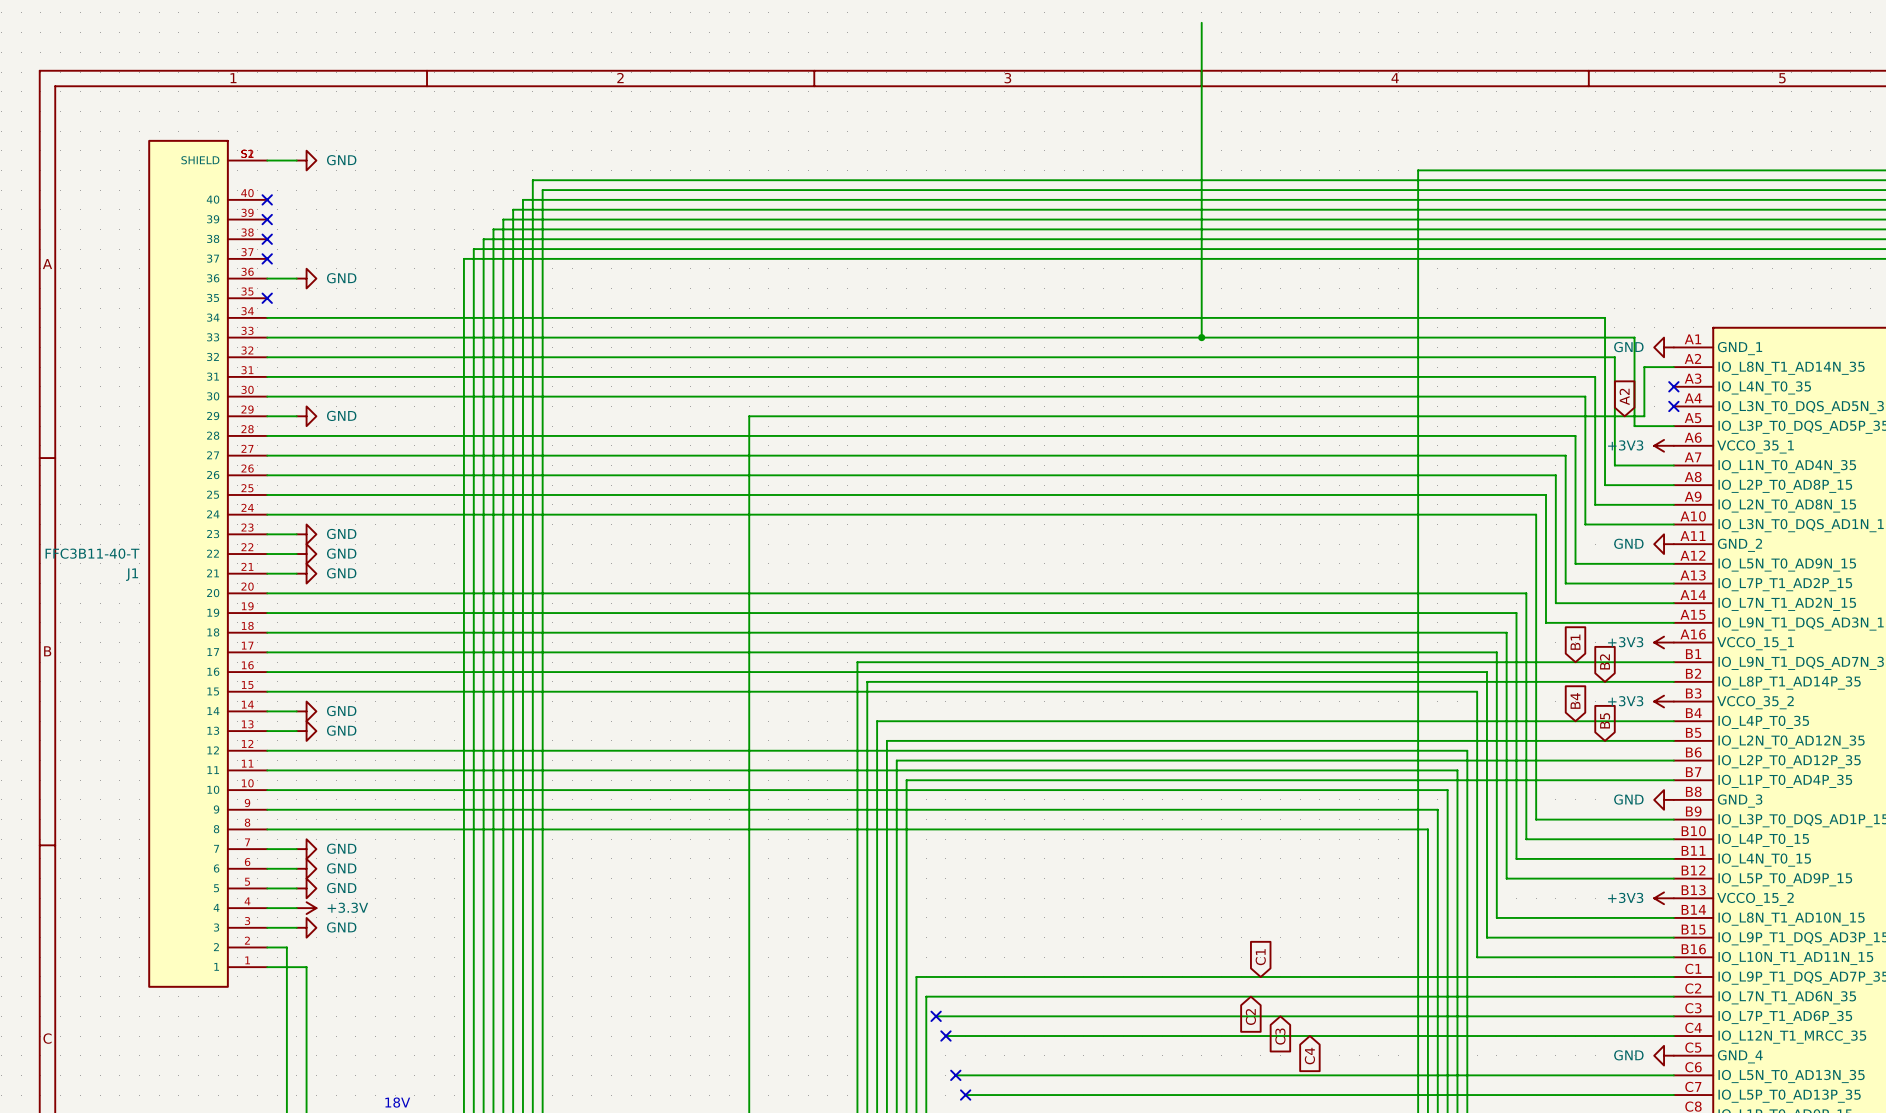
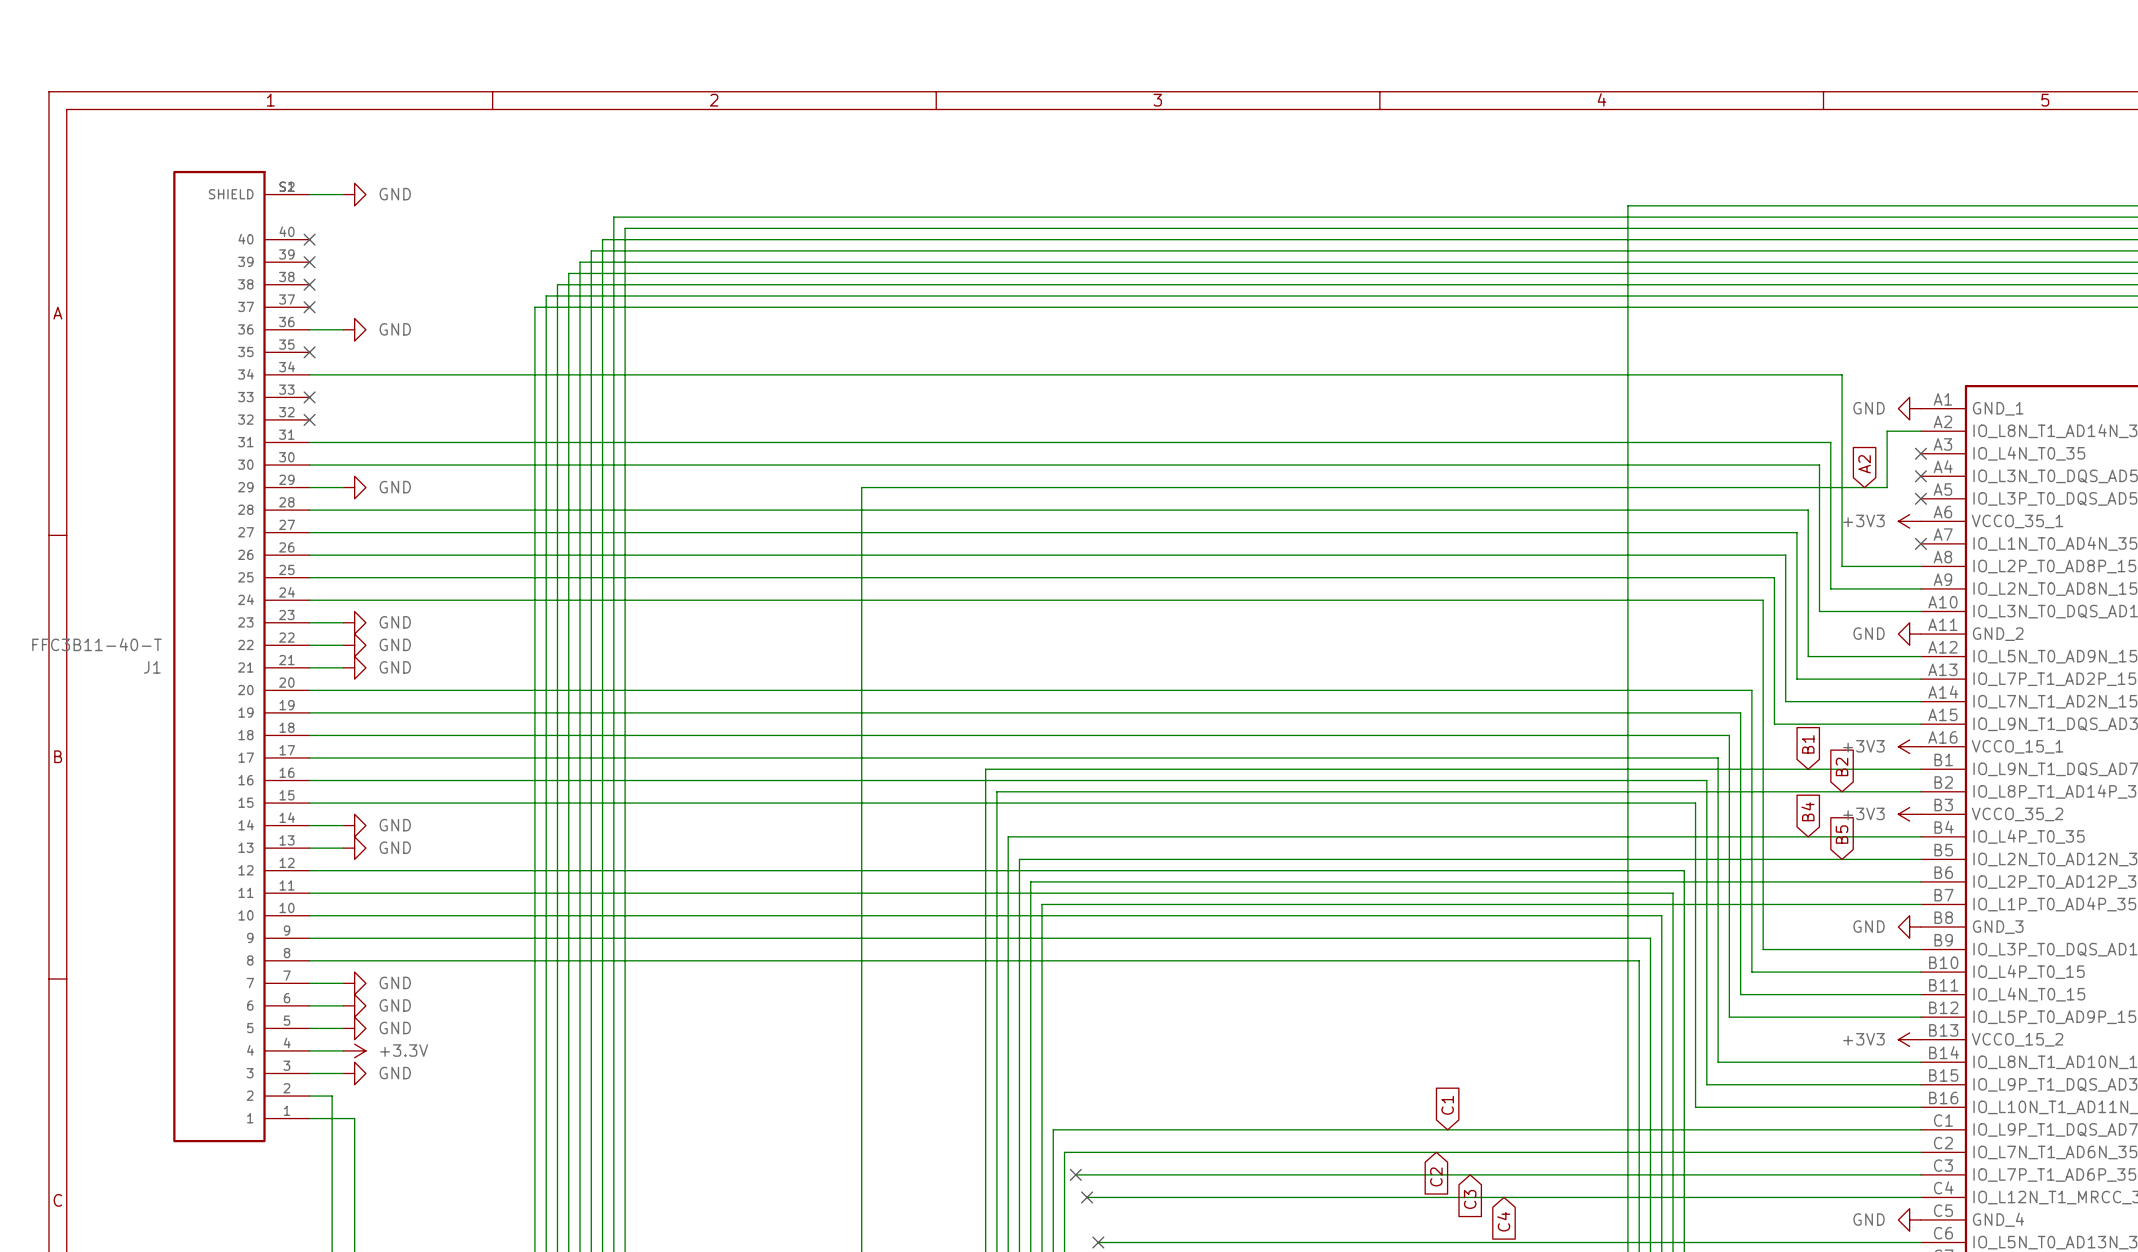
wire: (1201, 22) (1201, 337) -> none
wire: (267, 337) (1634, 337) (1634, 426) (1673, 426) -> none
no-connect mark: none -> (309, 397)
junction: (1201, 337) -> none
wire: (267, 357) (1614, 357) (1614, 465) (1673, 465) -> none
no-connect mark: none -> (309, 419)
no-connect mark: none -> (1920, 498)
no-connect mark: none -> (1920, 543)

